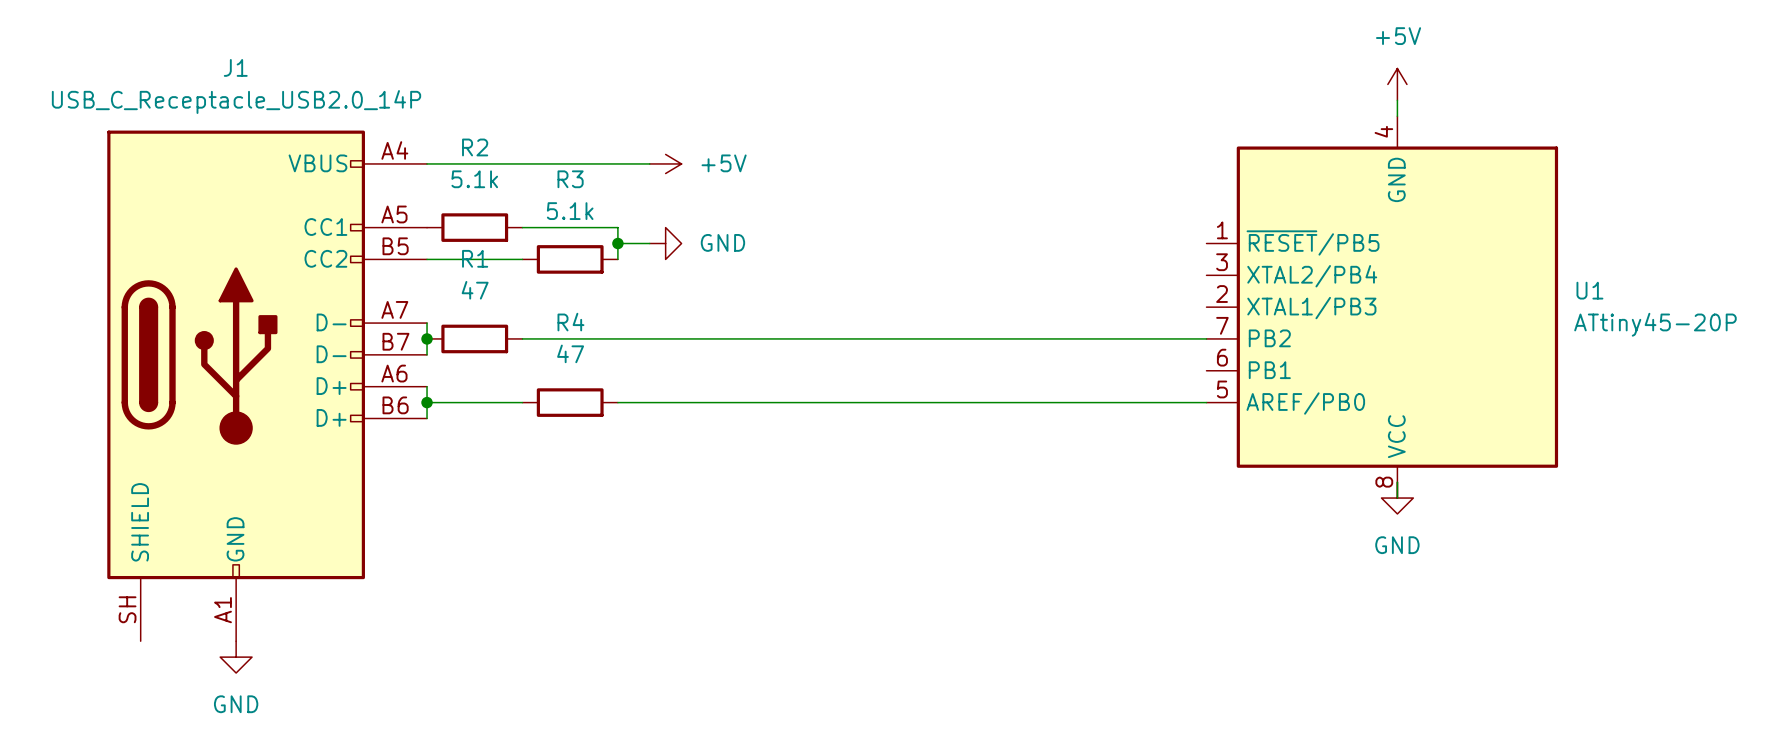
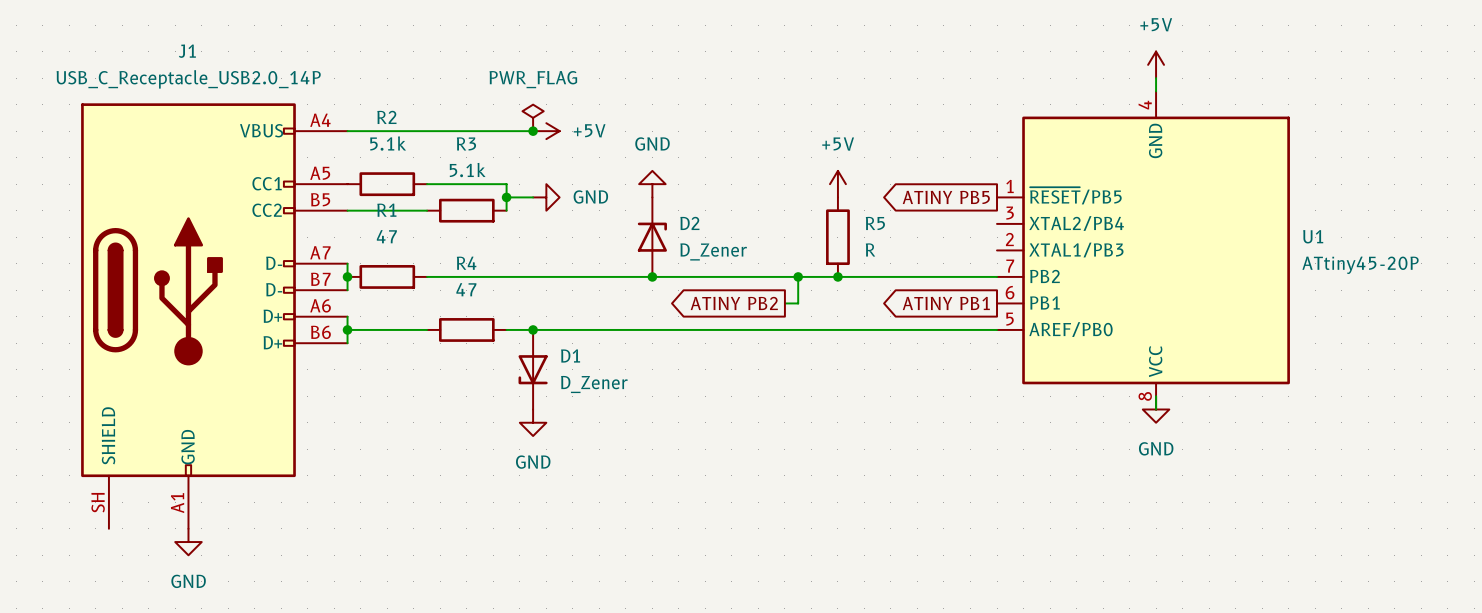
power symbol: none -> PWR_FLAG (533, 117)
junction: none -> (533, 131)
power symbol: none -> GND (652, 184)
power symbol: none -> +5V (837, 184)
global label: none -> ATINY PB5 (946, 197)
D2: none -> D_Zener (652, 237)
R5: none -> R (837, 237)
junction: none -> (652, 276)
wire: none -> (798, 276) (798, 303) (784, 303)
junction: none -> (798, 276)
junction: none -> (837, 276)
global label: none -> ATINY PB2 (734, 303)
global label: none -> ATINY PB1 (946, 303)
junction: none -> (533, 329)
D1: none -> D_Zener (533, 369)
power symbol: none -> GND (533, 422)

